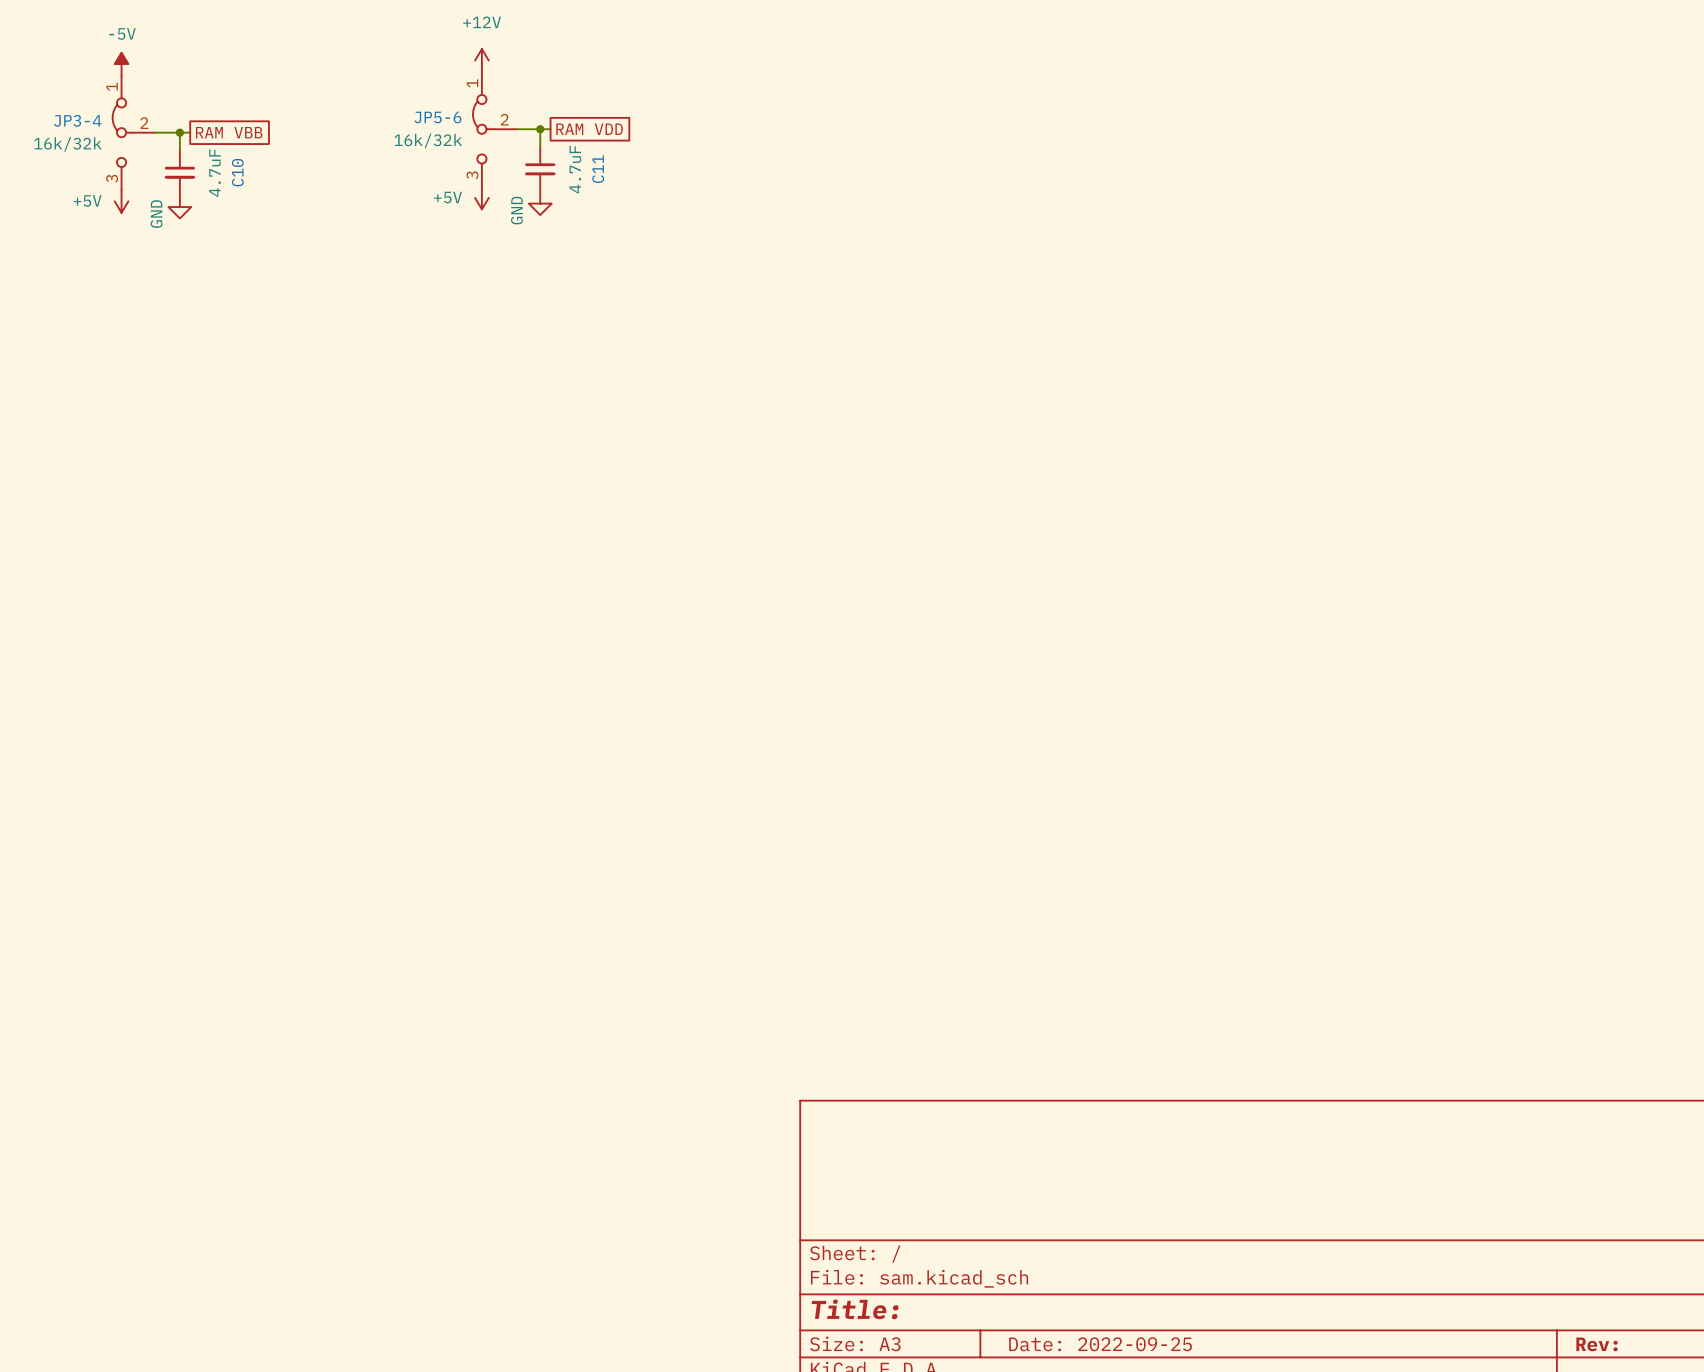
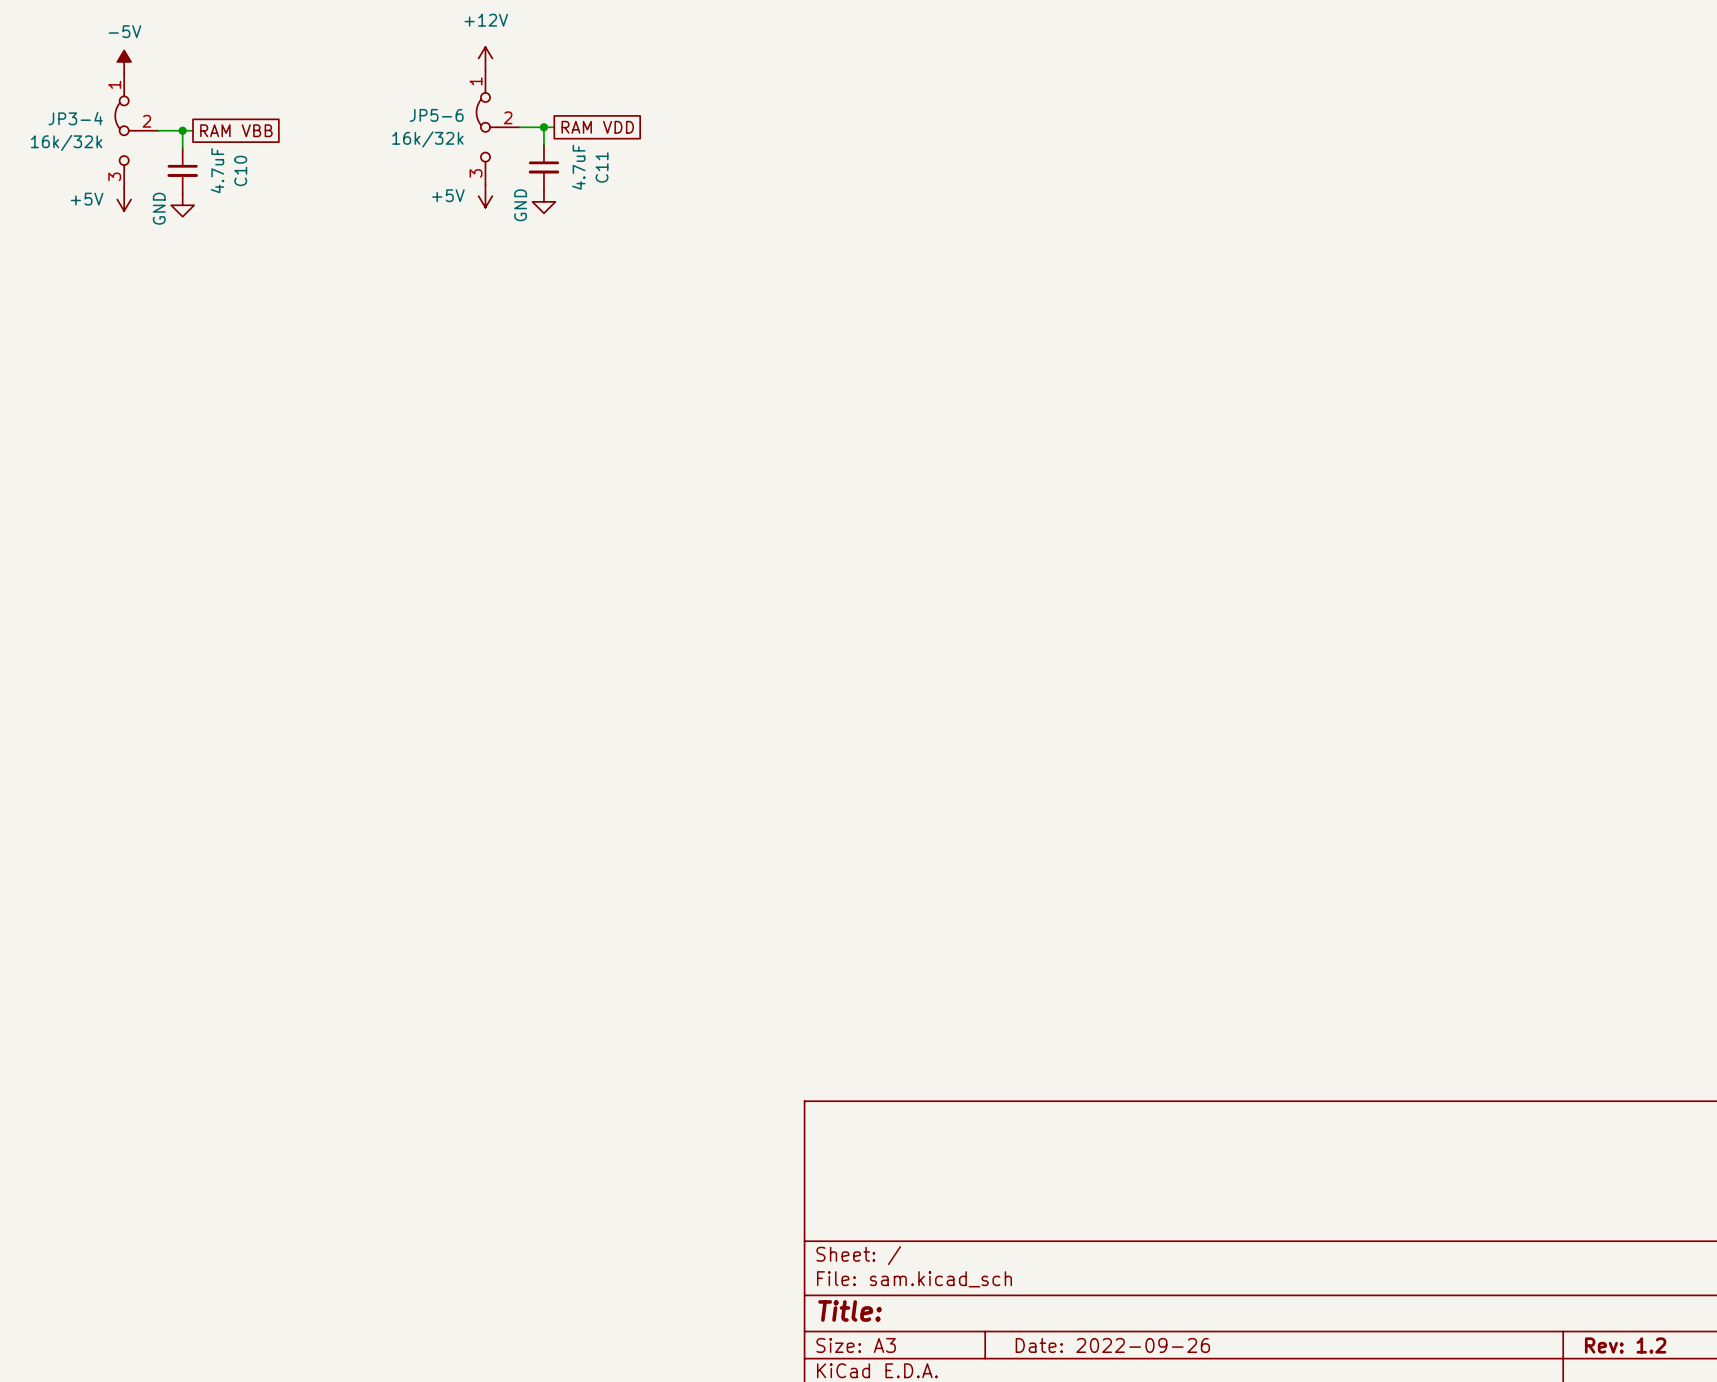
title block: Date: 2022-09-25 (1100, 1344) -> Date: 2022-09-26 (1112, 1345)
title block: Rev: (1596, 1344) -> Rev: 1.2 (1625, 1345)

